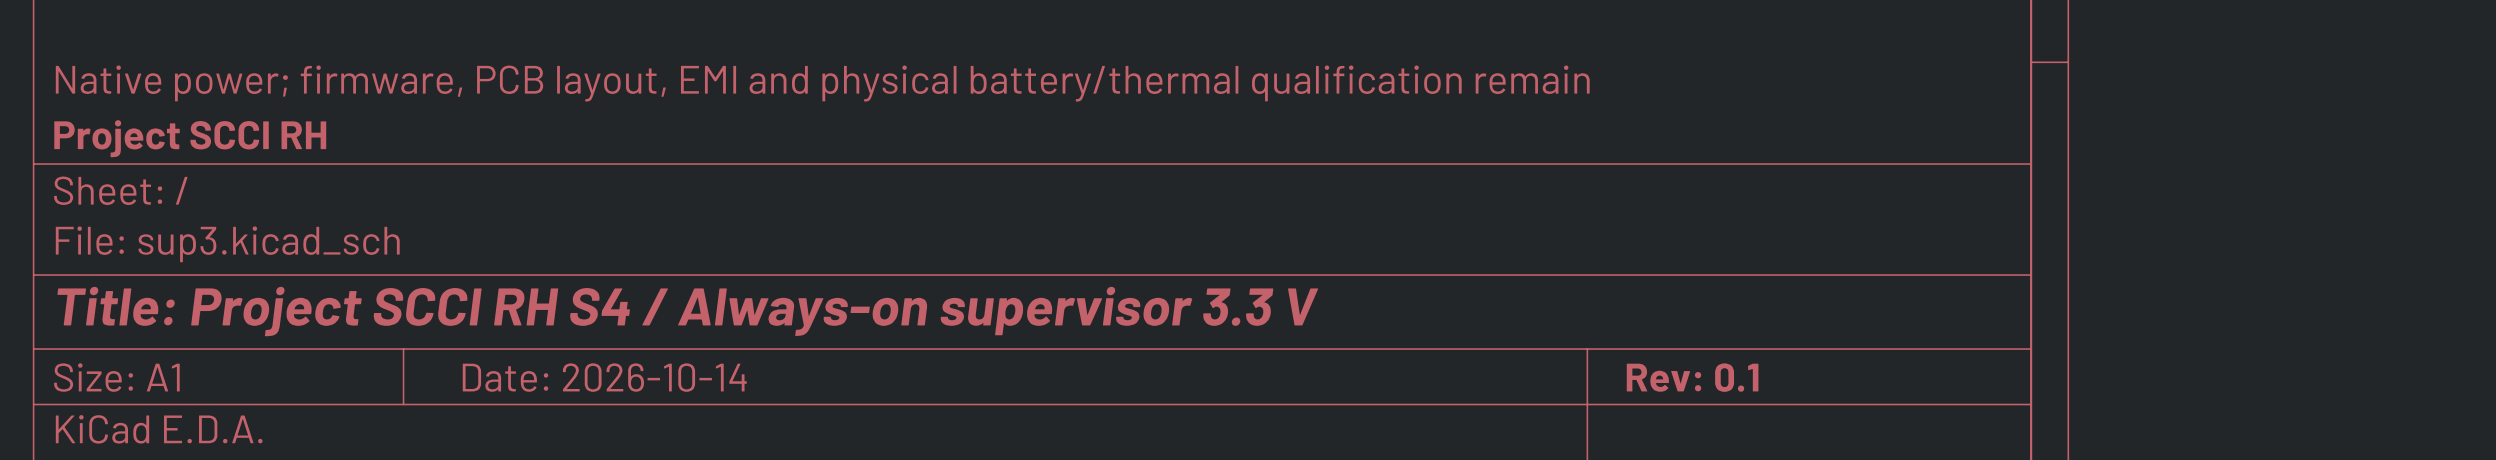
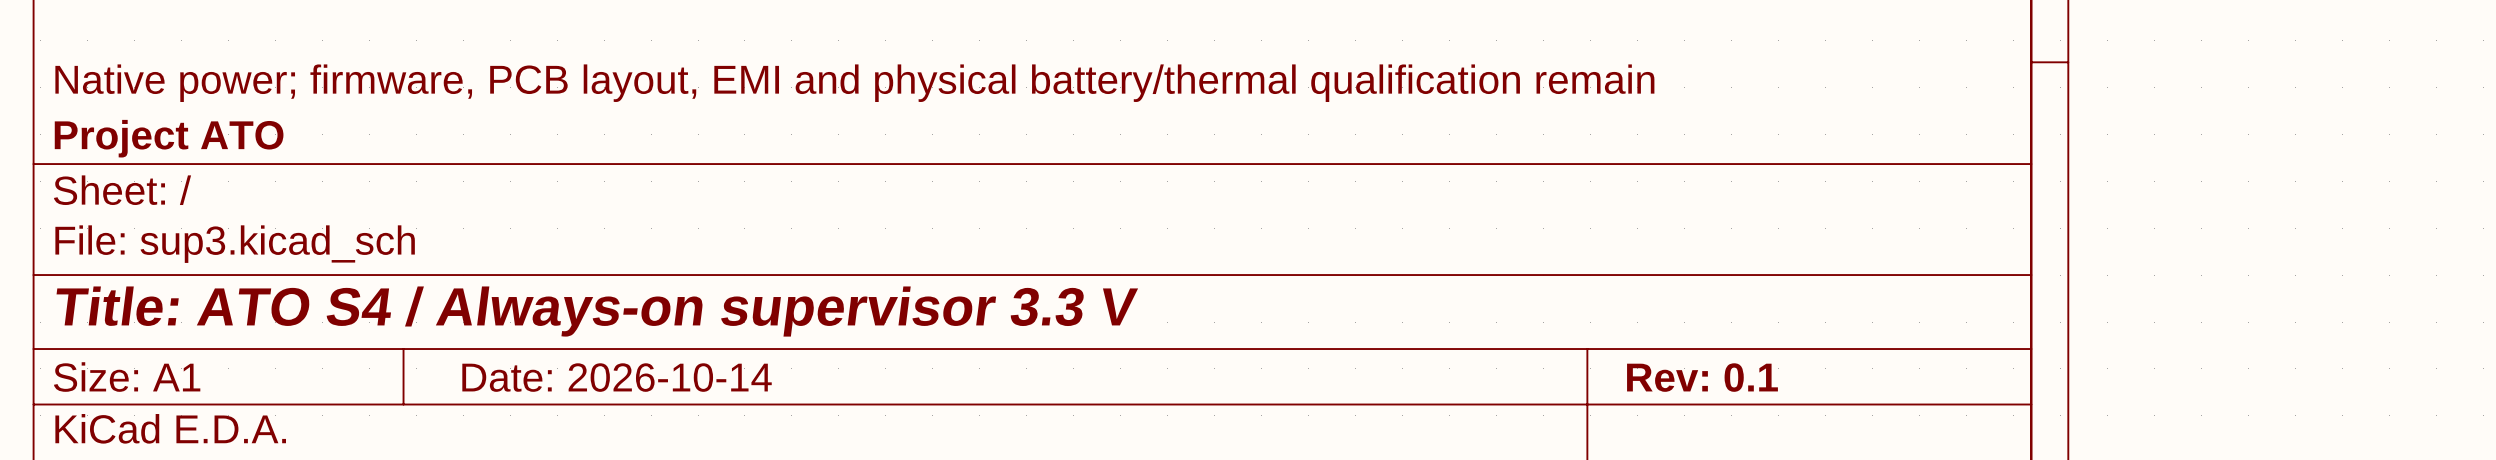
title block: Project SCCI RH (190, 138) -> Project ATO (169, 138)
title block: Title: Project SCCI RH S4 / Always-on supervisor 3.3 V (687, 311) -> Title: ATO S4 / Always-on supervisor 3.3 V (597, 311)

